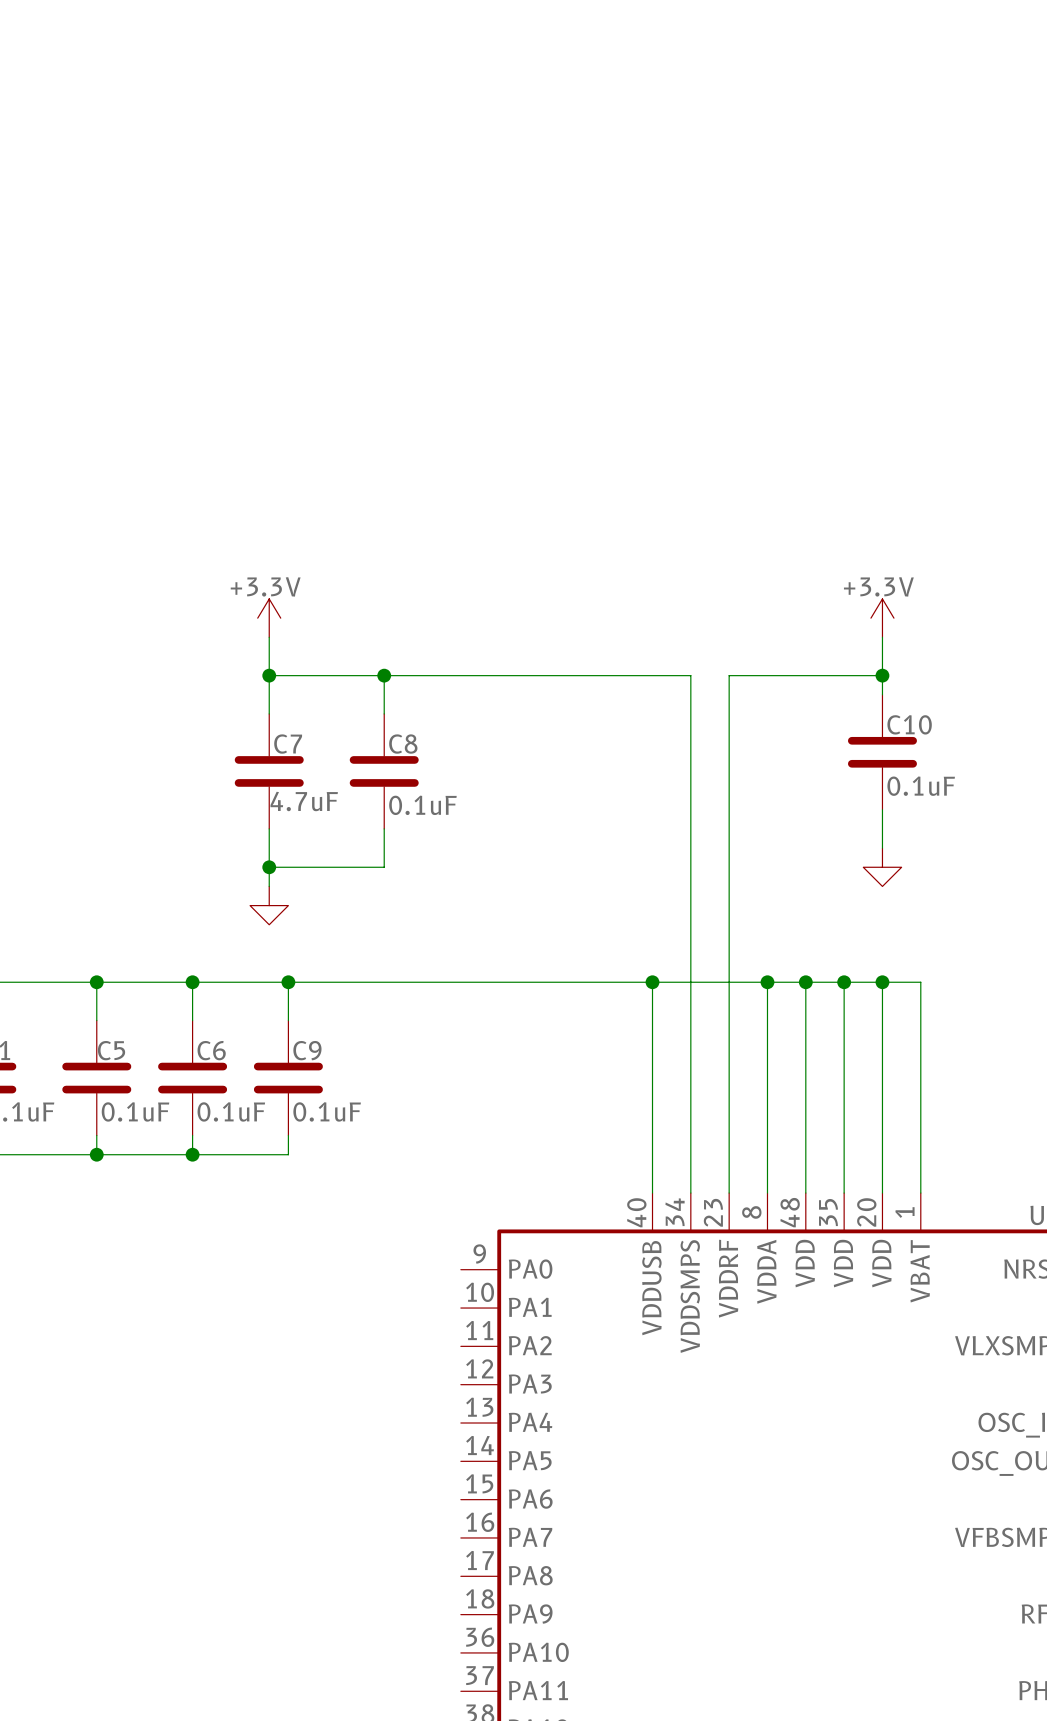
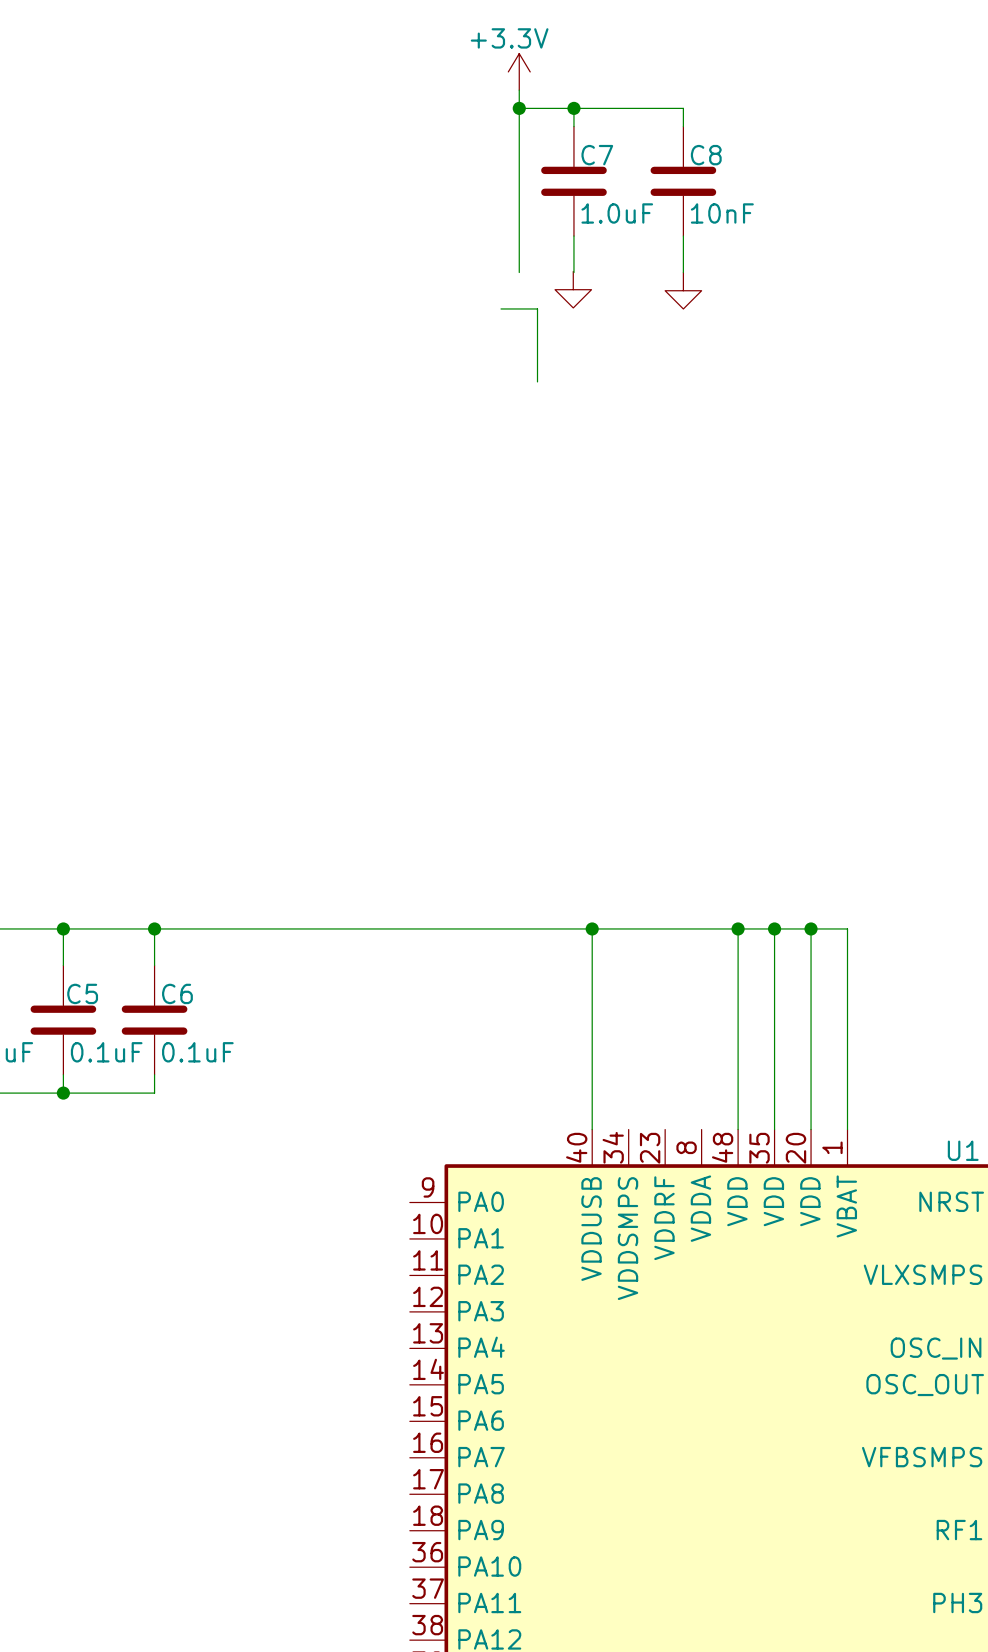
power symbol: none -> +3.3V (519, 71)
wire: none -> (519, 90) (519, 272)
wire: none -> (519, 108) (683, 108) (683, 126)
junction: none -> (519, 108)
wire: none -> (573, 108) (573, 126)
junction: none -> (573, 108)
wire: none -> (573, 236) (573, 272)
wire: none -> (683, 236) (683, 272)
power symbol: none -> (573, 289)
power symbol: none -> (683, 290)
wire: none -> (501, 308) (537, 308) (537, 381)
power symbol: +3.3V (269, 618) -> none
power symbol: +3.3V (882, 618) -> none
wire: (269, 637) (269, 713) -> none
wire: (882, 637) (882, 694) -> none
wire: (269, 675) (690, 675) (690, 1193) -> none
junction: (269, 675) -> none
wire: (384, 675) (384, 713) -> none
junction: (384, 675) -> none
wire: (882, 675) (729, 675) (729, 1193) -> none
junction: (882, 675) -> none
C10: 0.1uF (882, 752) -> none
C7 position: (269, 771) -> (573, 181)
C8 position: (384, 771) -> (683, 181)
C7 value: 4.7uF (304, 801) -> 1.0uF (617, 213)
C8 value: 0.1uF (422, 805) -> 10nF (722, 213)
wire: (882, 809) (882, 848) -> none
wire: (269, 828) (269, 886) -> none
wire: (384, 828) (384, 867) (269, 867) -> none
junction: (269, 867) -> none
power symbol: (882, 867) -> none
power symbol: (269, 905) -> none
wire: (288, 982) (288, 1020) -> none
junction: (288, 982) -> none
wire: (767, 982) (767, 1193) -> none
junction: (767, 982) -> none
C9: 0.1uF (288, 1078) -> none
wire: (288, 1135) (288, 1154) (192, 1154) -> none
junction: (192, 1154) -> none

